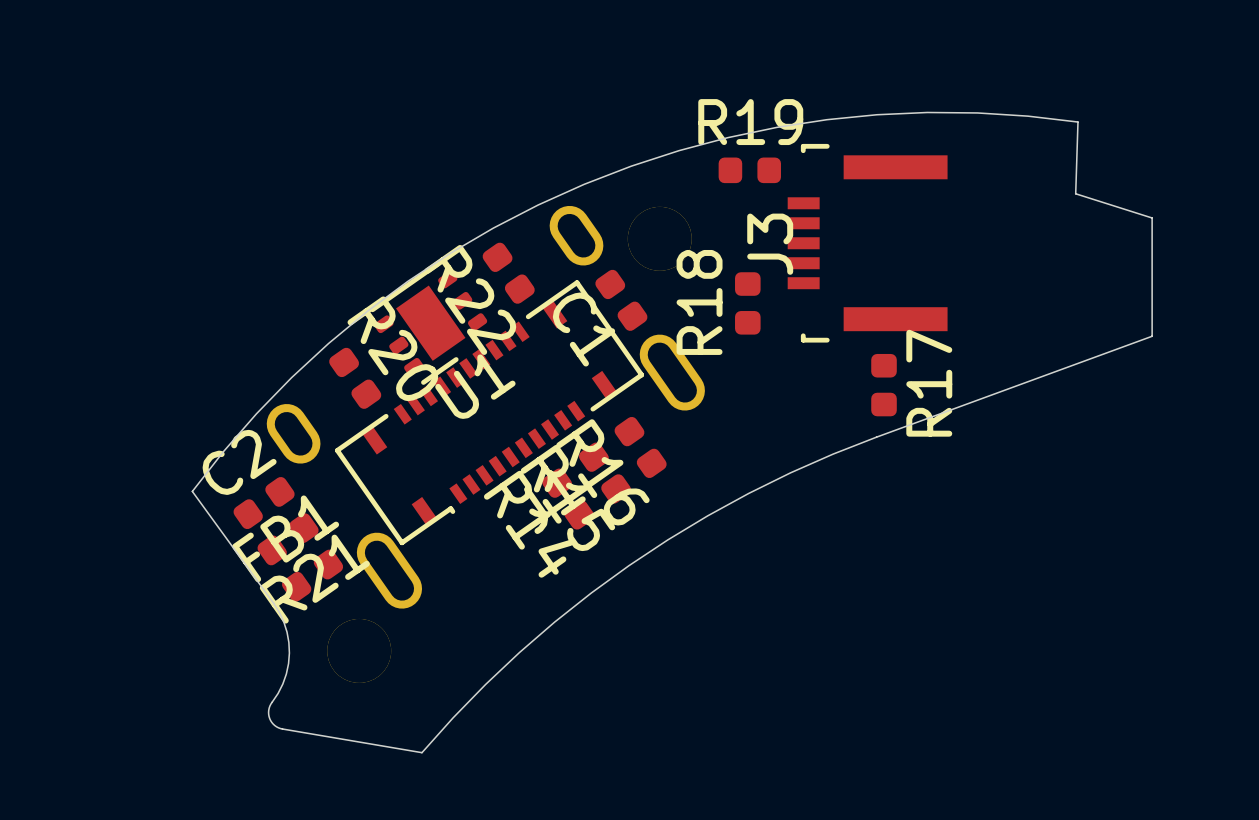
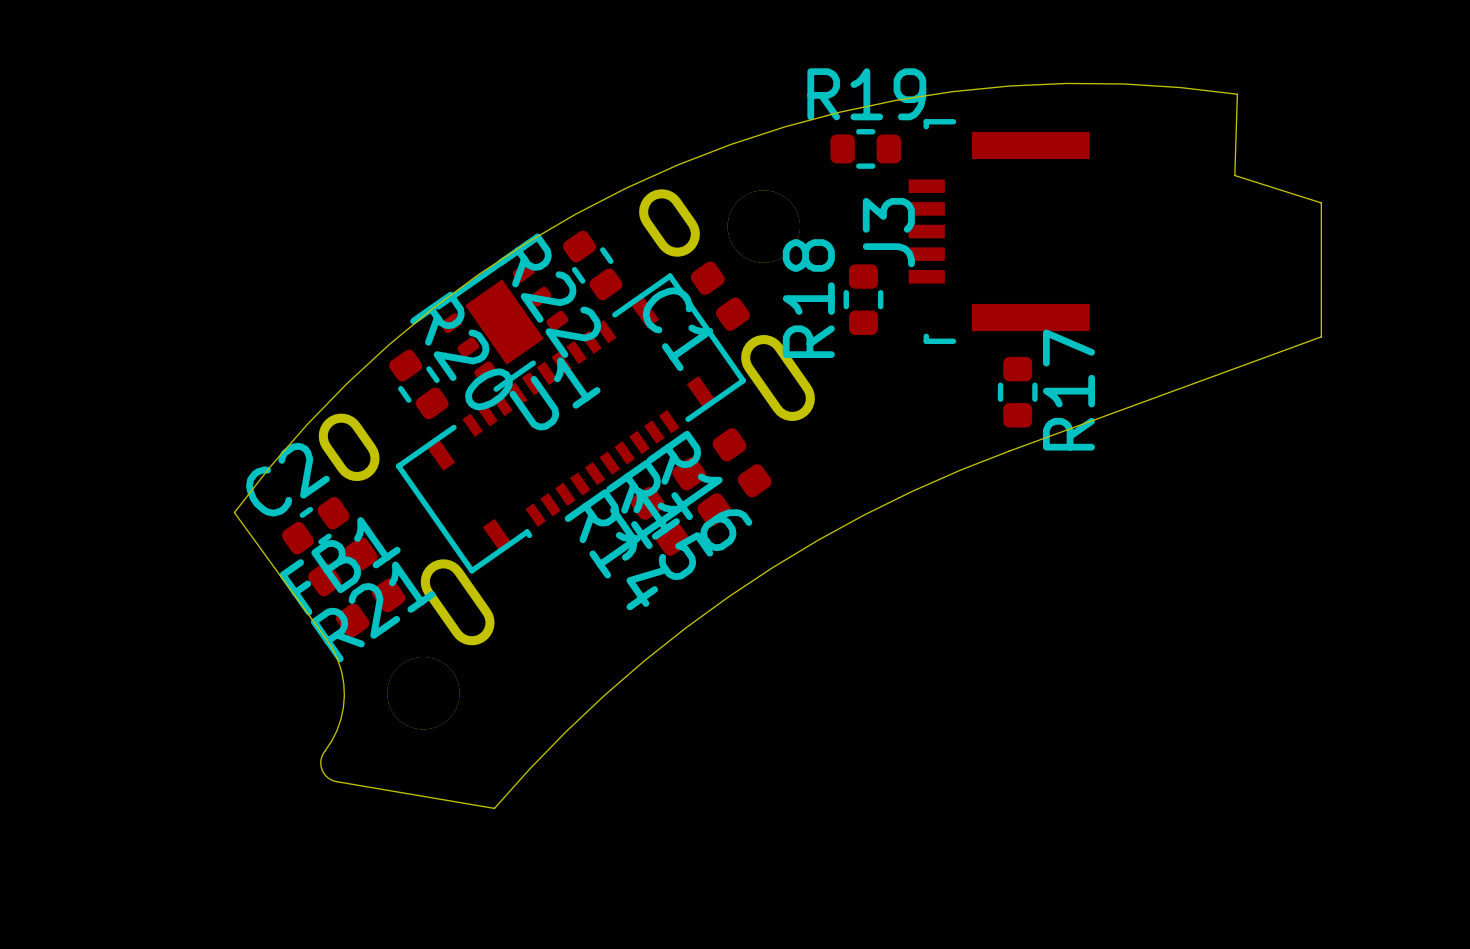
R19 footprint: [718, 157, 781, 184] -> [830, 129, 902, 169]
R22 footprint: [482, 242, 535, 304] -> [562, 230, 623, 301]
R18 footprint: [735, 272, 761, 335] -> [843, 264, 884, 335]
R20 footprint: [329, 347, 382, 409] -> [389, 349, 449, 420]
R17 footprint: [871, 353, 897, 417] -> [997, 356, 1038, 428]
C2 footprint: [233, 477, 295, 530] -> [281, 496, 350, 555]

